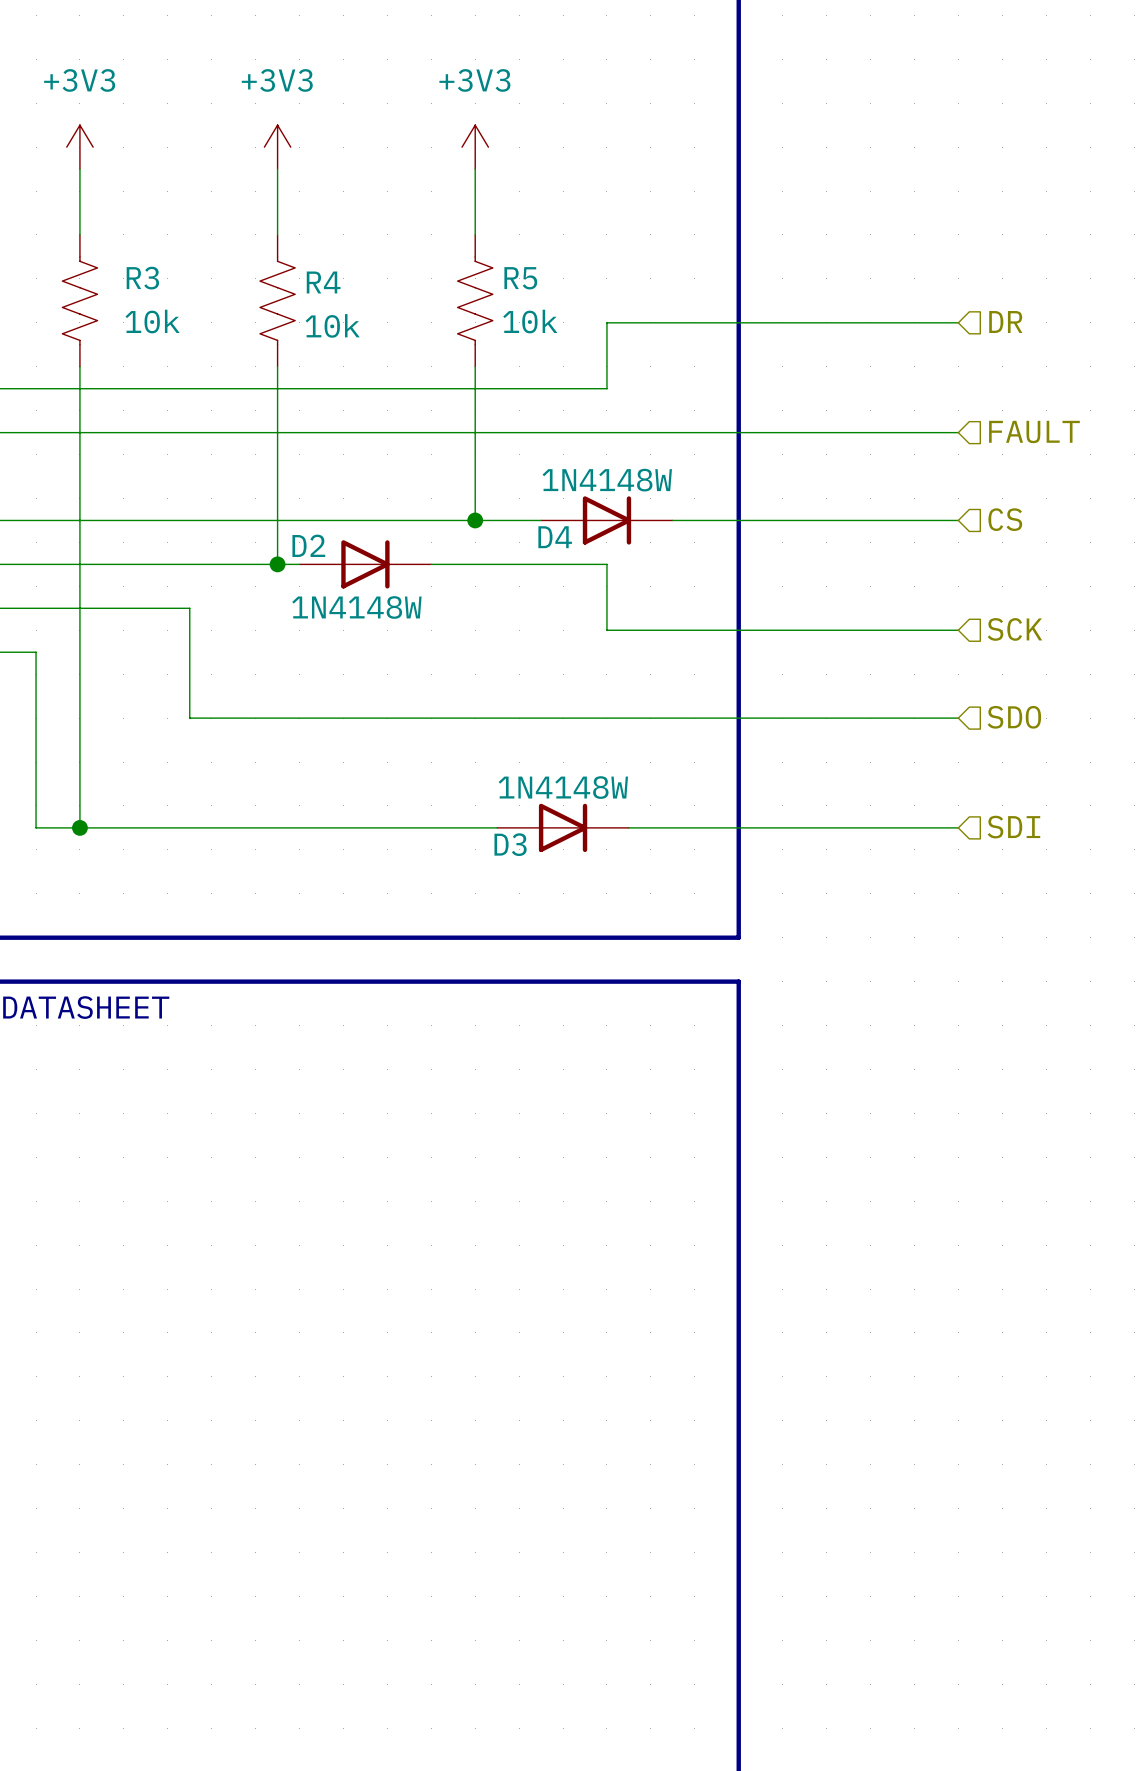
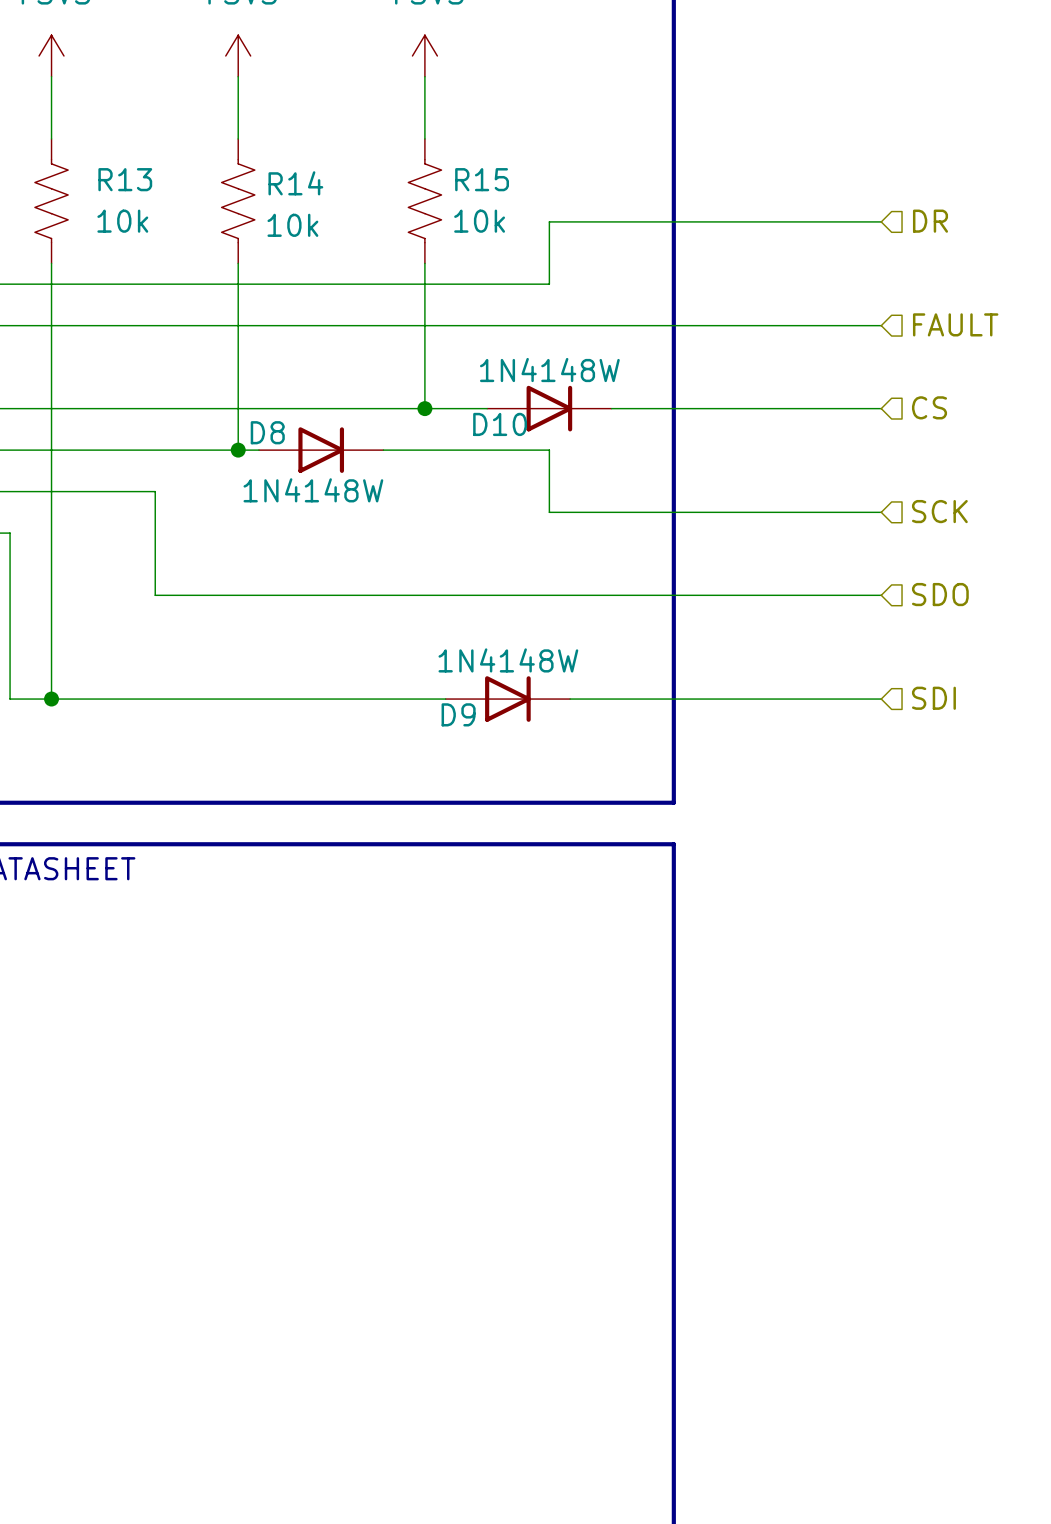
R3 name: R3 (142, 278) -> R13 (125, 179)
R5 name: R5 (520, 278) -> R15 (482, 179)
R4 name: R4 (323, 282) -> R14 (295, 183)
D4 name: D4 (555, 537) -> D10 (500, 424)
D2 name: D2 (308, 545) -> D8 (267, 432)
D3 name: D3 (510, 844) -> D9 (458, 714)

